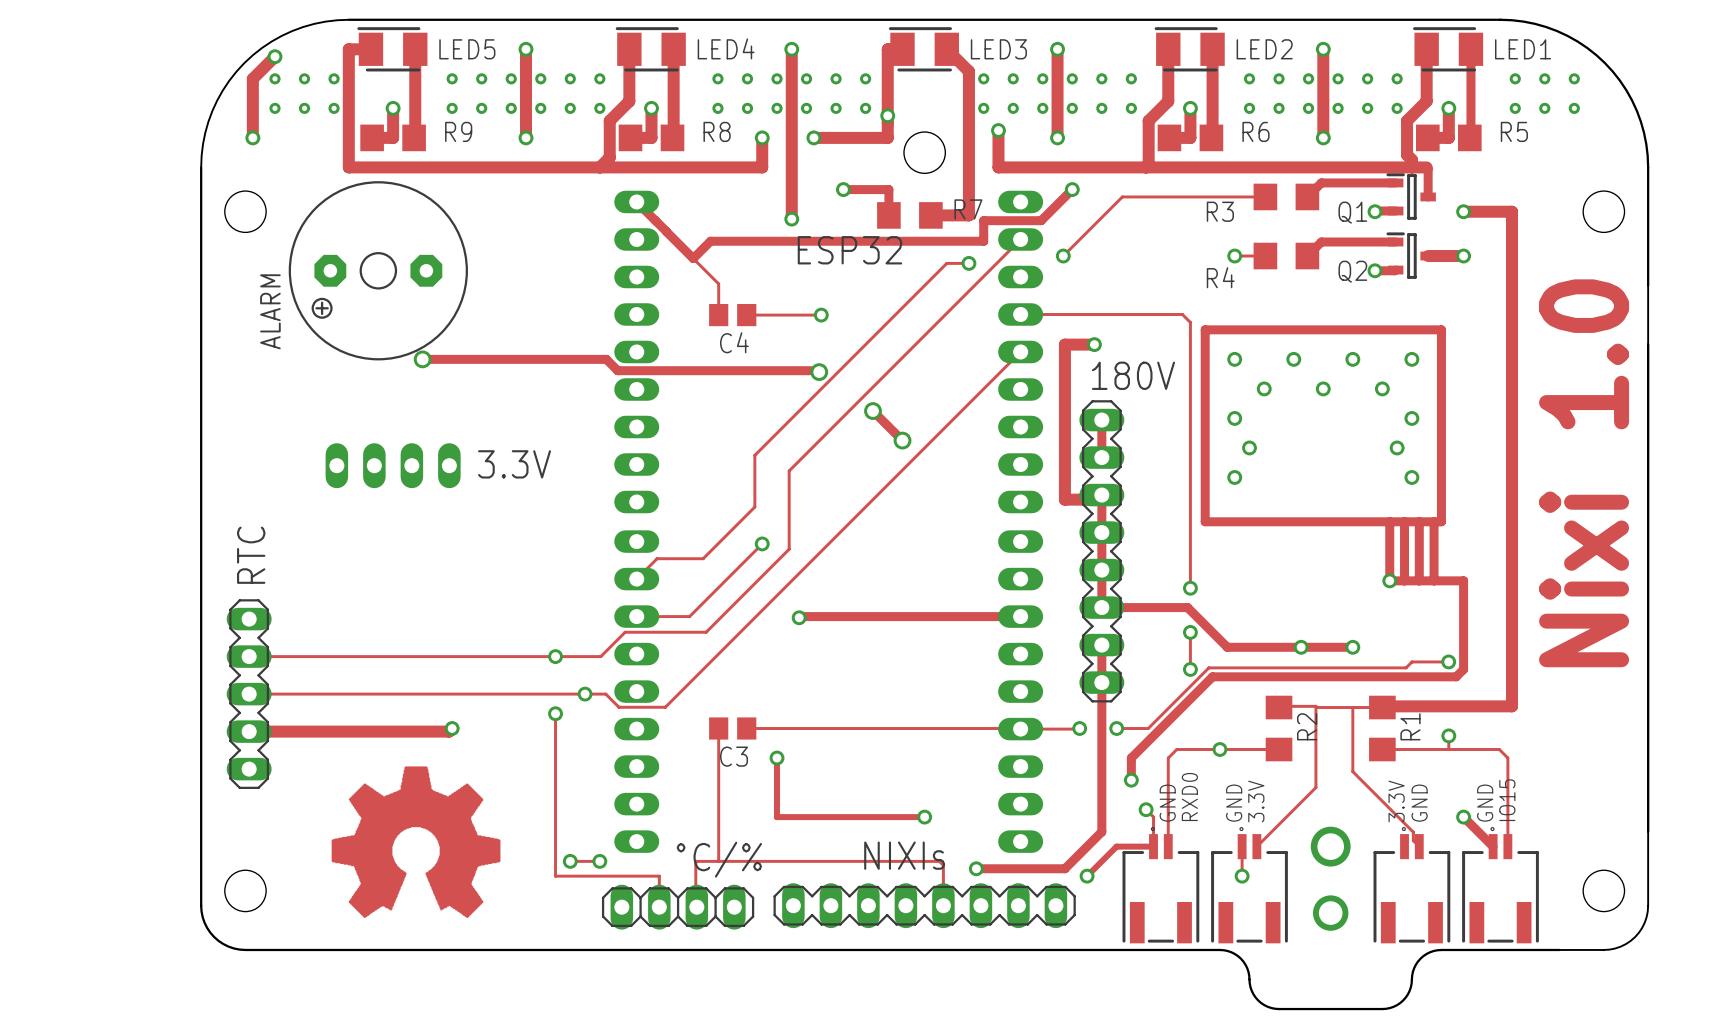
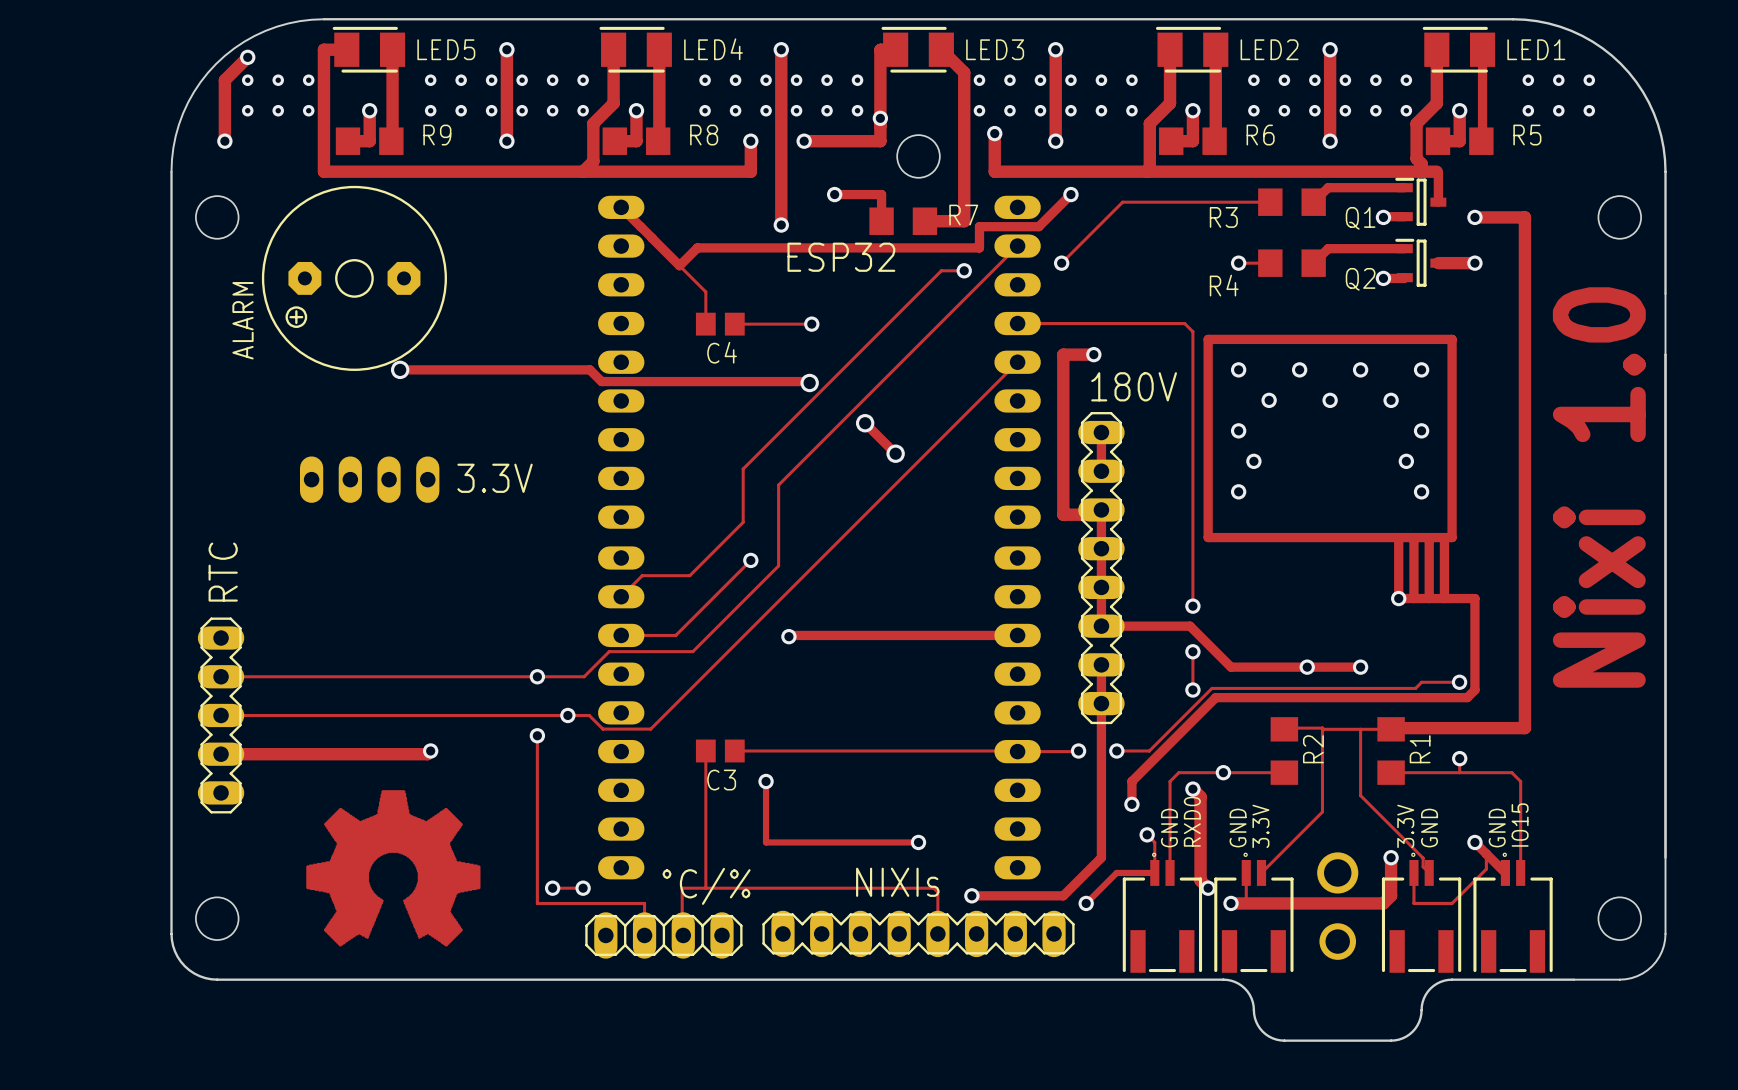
track: none -> (1192, 789) (1200, 796) (1200, 880) (1208, 888)
via: none -> (1192, 789)
track: none -> (1486, 853) (1486, 869) (1452, 903) (1413, 903) (1413, 872)
track: none -> (1391, 857) (1391, 895) (1383, 903) (1231, 903)
via: none -> (1391, 857)
via: none -> (1208, 888)
via position: (1242, 876) -> (1231, 903)

